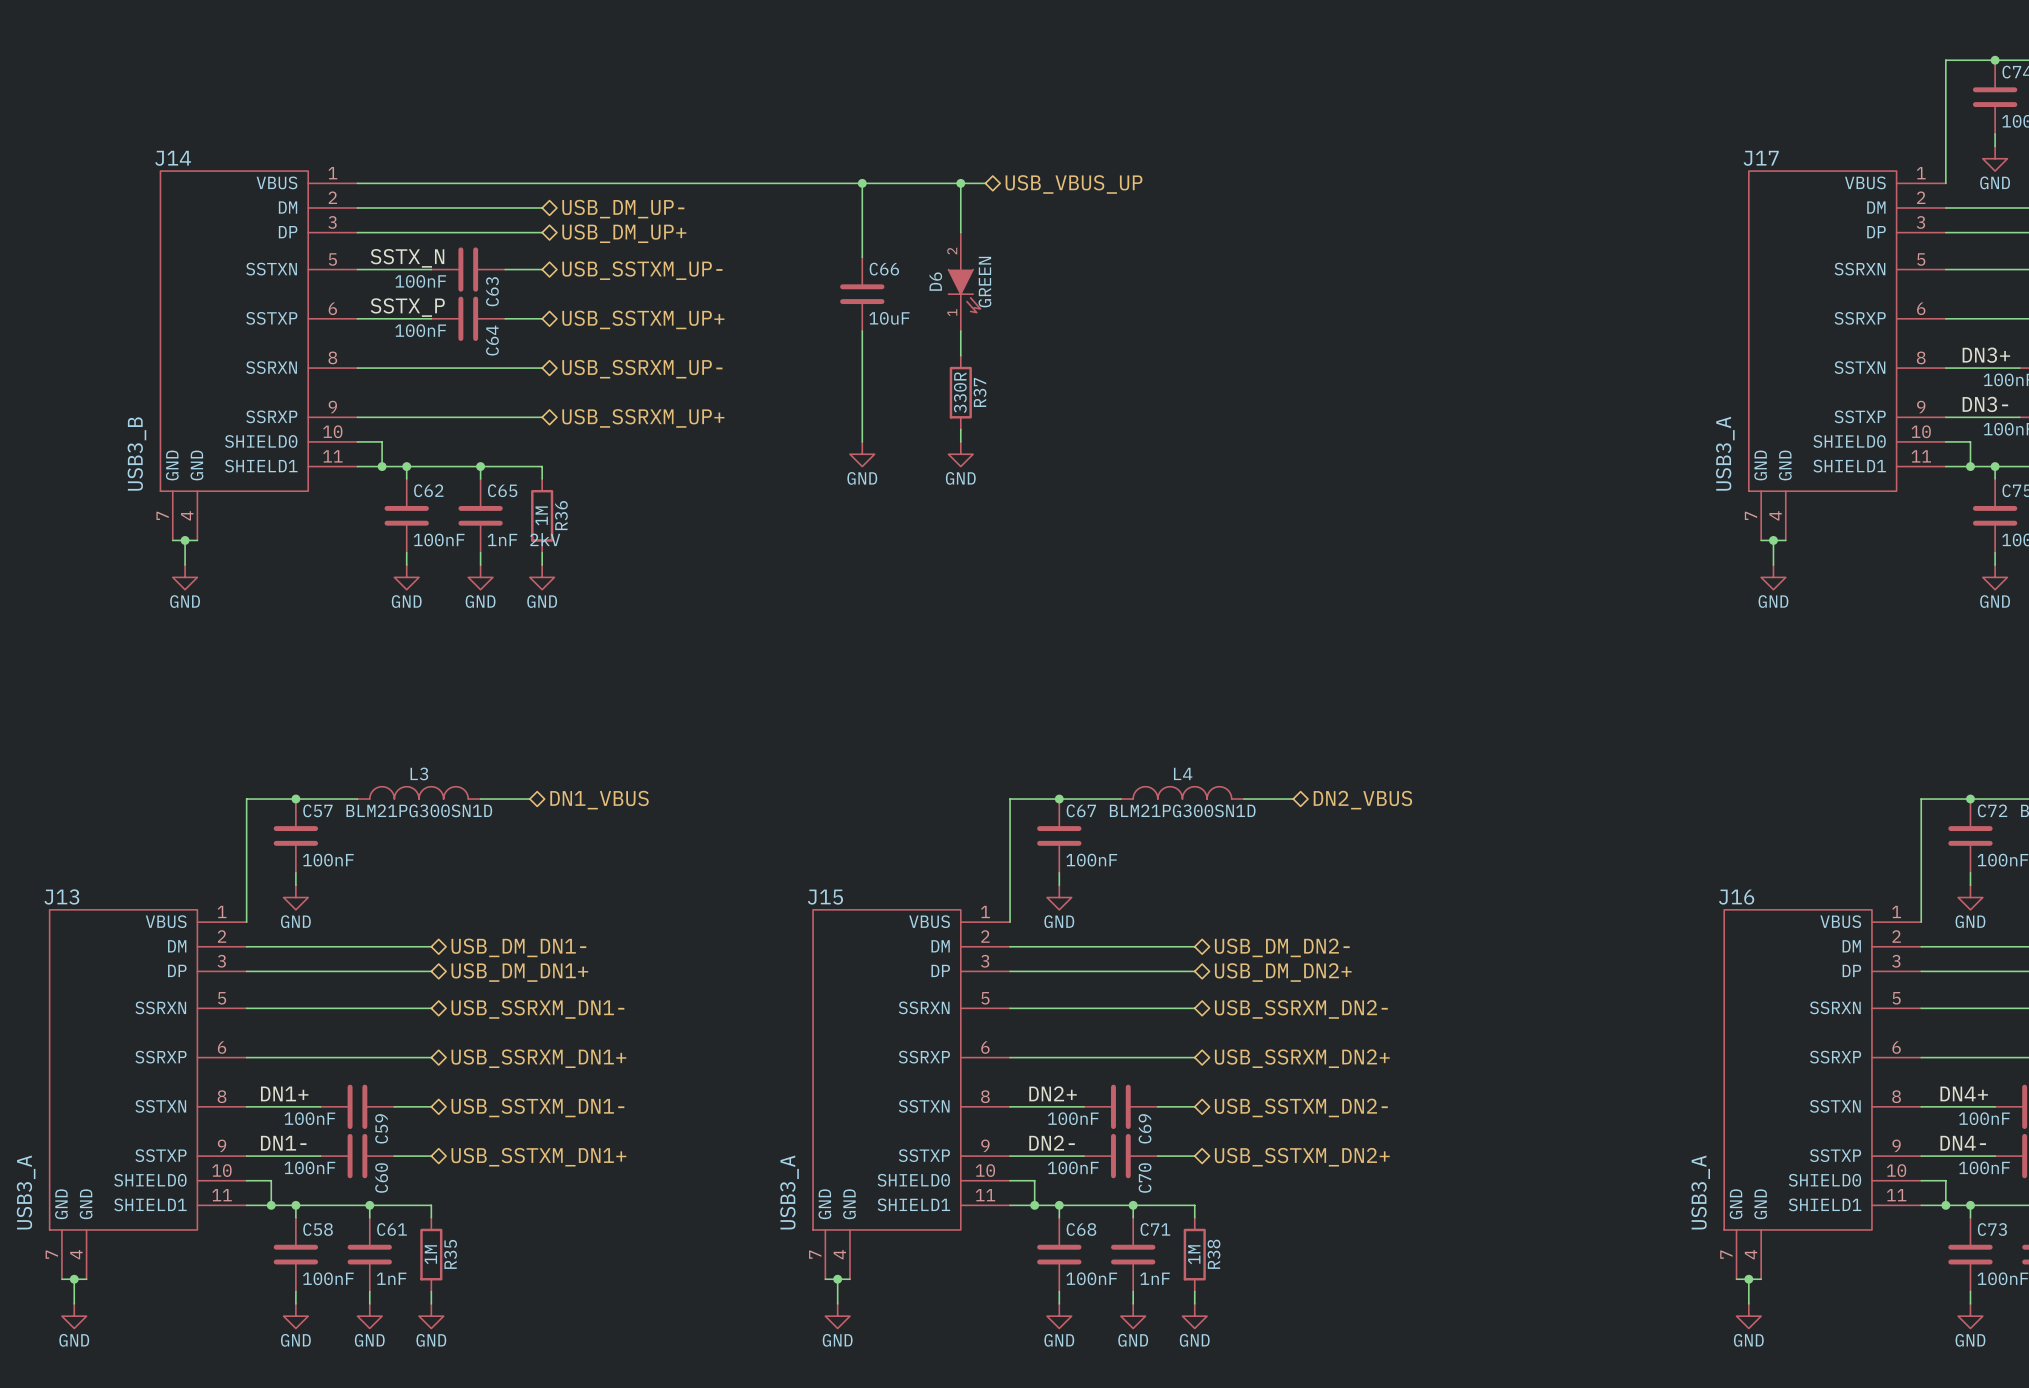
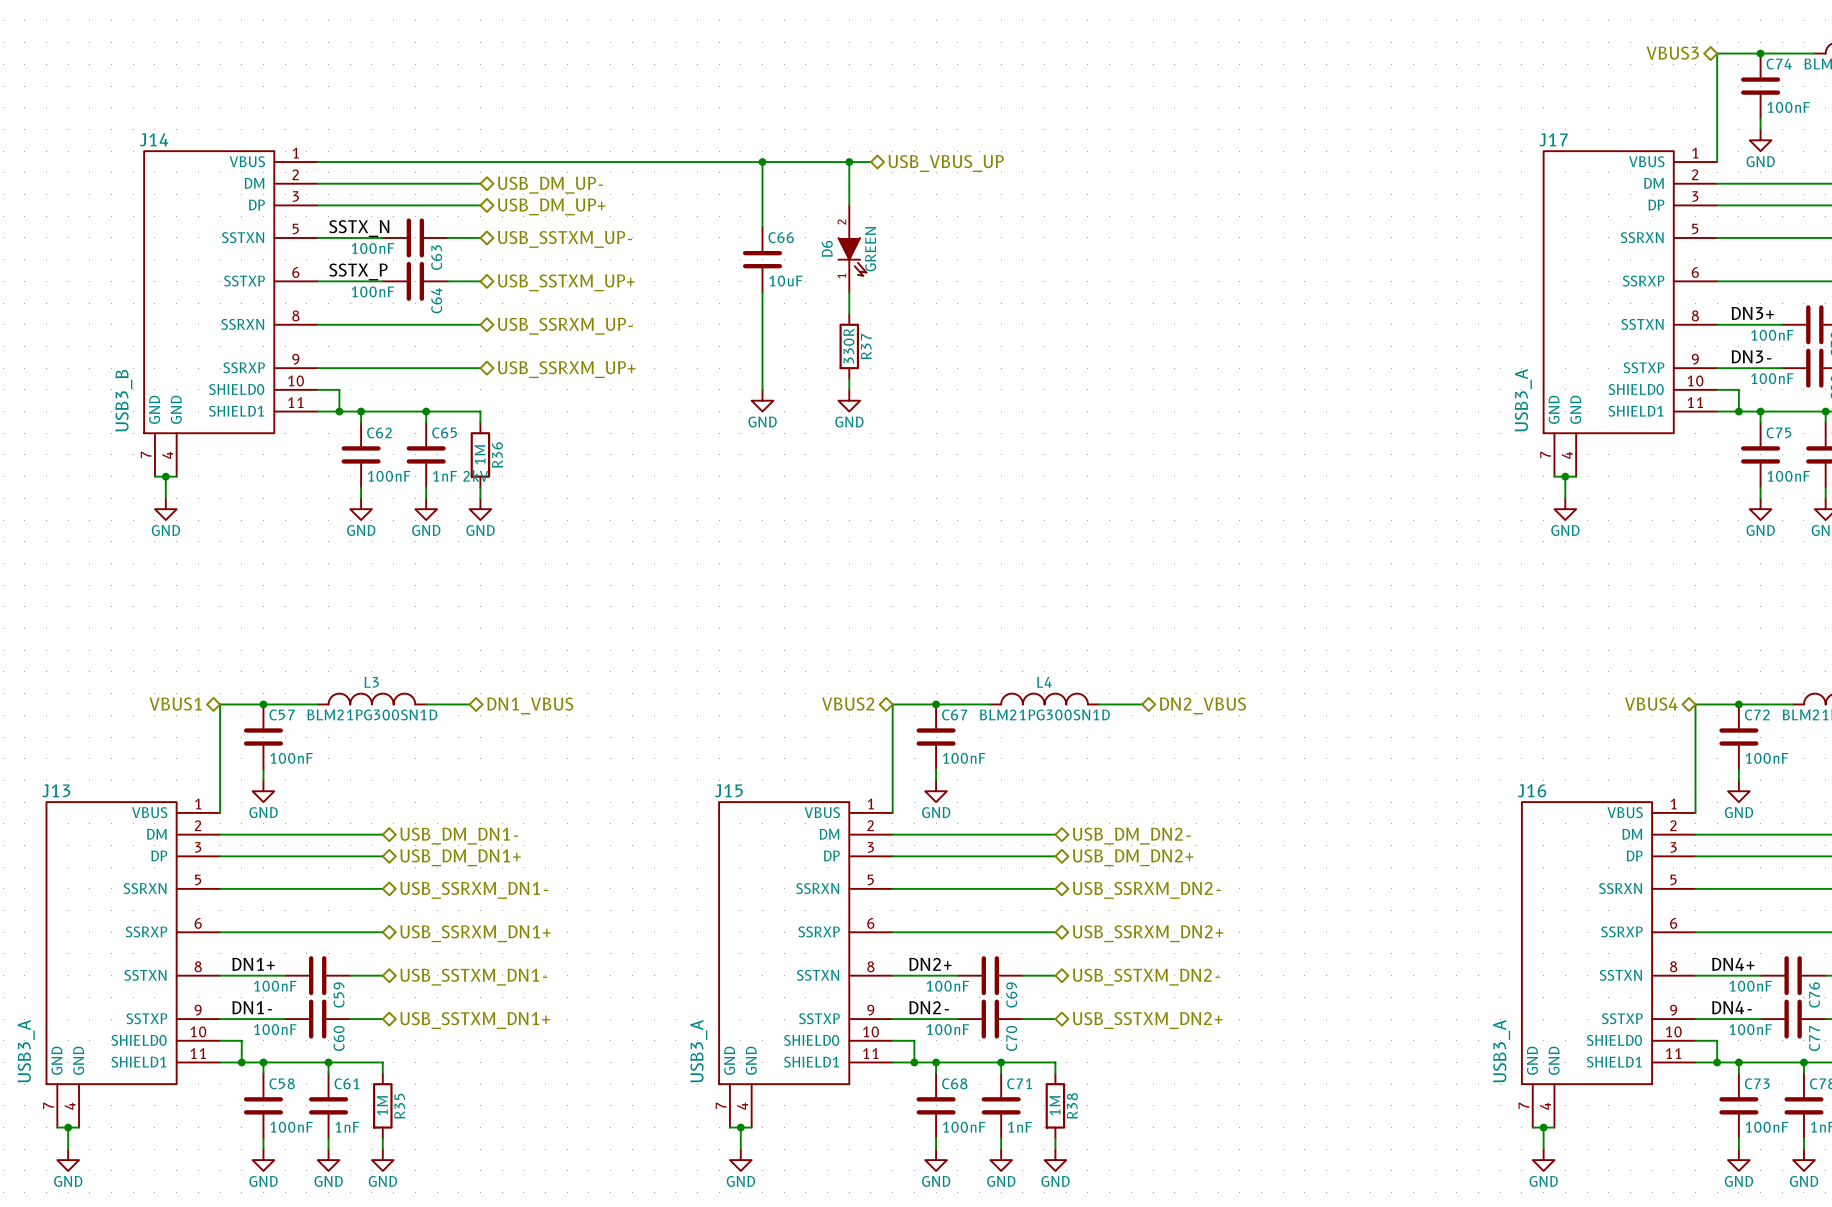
hierarchical label: none -> VBUS3 (1672, 53)
hierarchical label: none -> VBUS1 (175, 704)
hierarchical label: none -> VBUS2 (848, 704)
hierarchical label: none -> VBUS4 (1651, 704)

